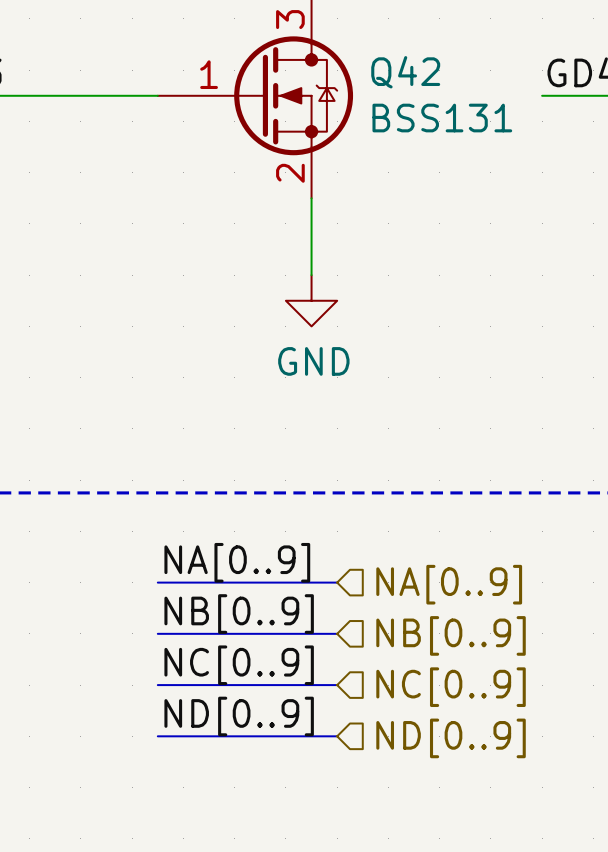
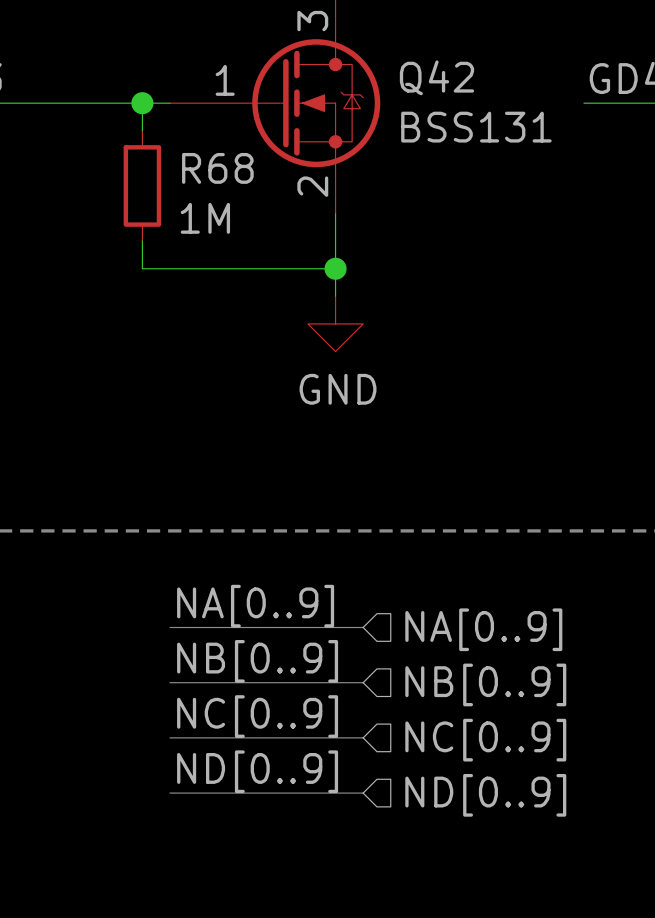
wire: none -> (142, 103) (142, 130)
junction: none -> (142, 103)
R68: none -> 1M (142, 185)
wire: none -> (142, 241) (142, 268) (335, 268)
junction: none -> (335, 268)

